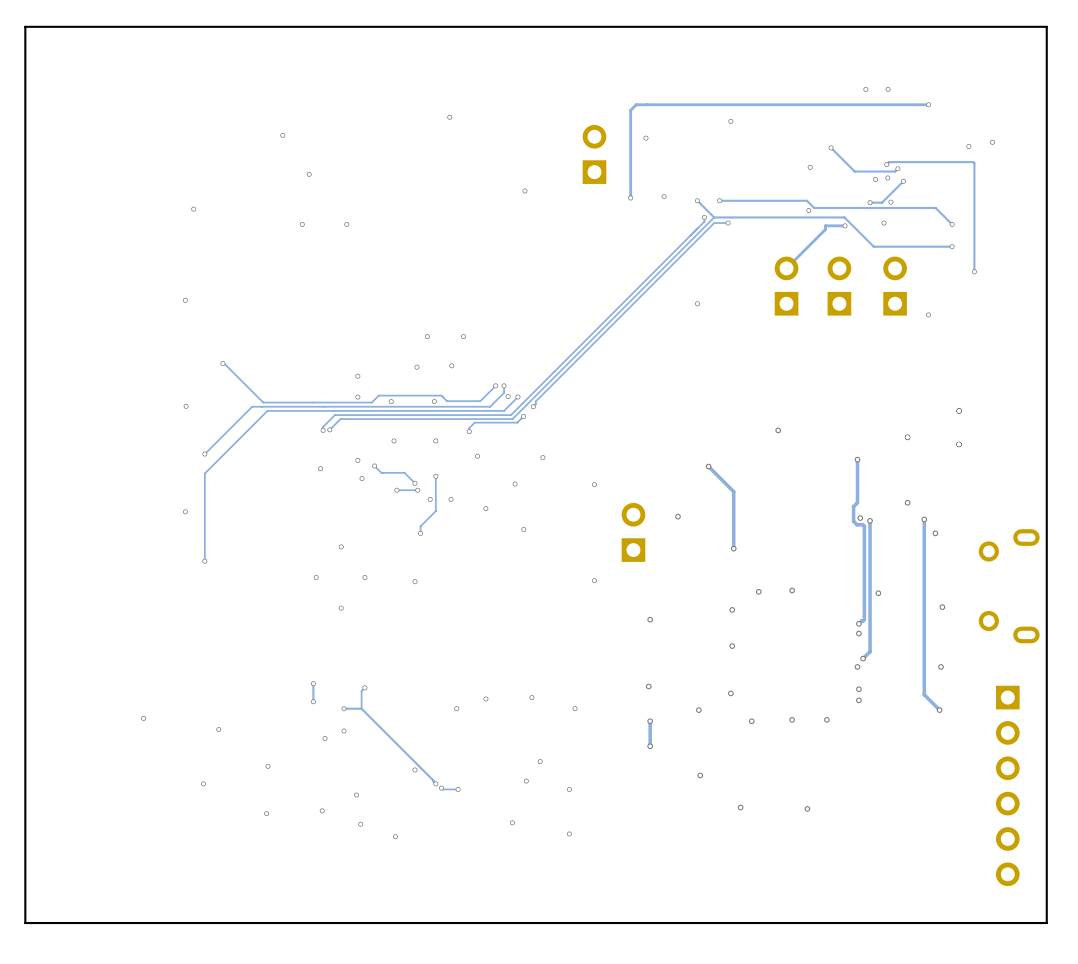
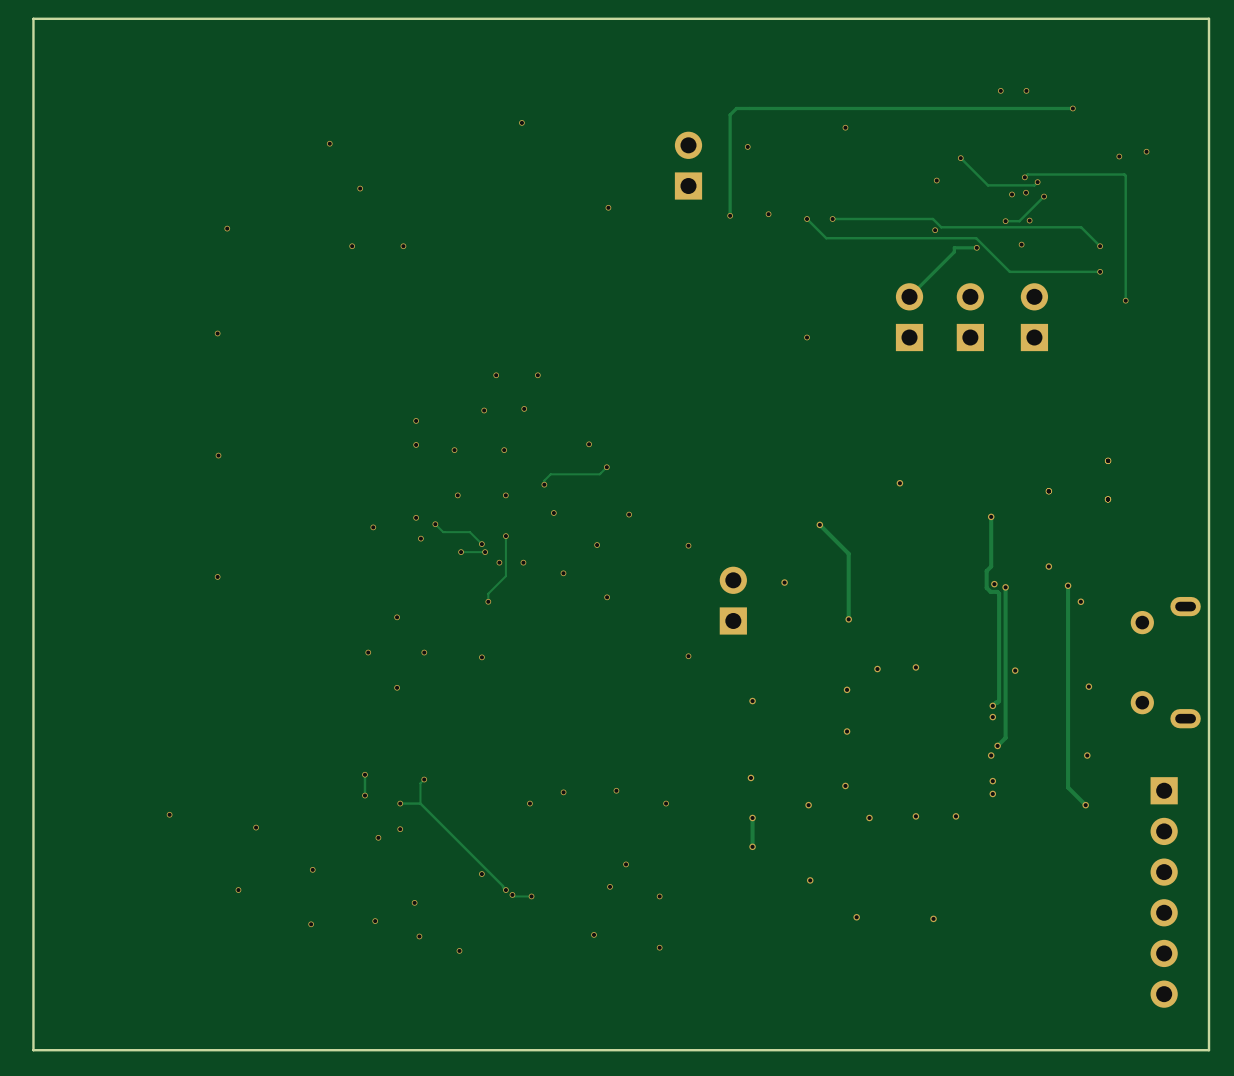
track: (704, 217) (704, 221) (511, 415) (334, 415) (323, 426) (323, 430) -> none
via: (704, 217) -> none
track: (714, 217) (512, 419) (340, 419) (329, 429) -> none
track: (728, 223) (714, 223) (535, 401) (533, 406) -> none
via: (728, 223) -> none
via: (928, 314) -> none
track: (222, 363) (263, 402) (371, 402) (378, 395) (441, 395) (446, 401) (480, 401) (495, 385) -> none
via: (222, 363) -> none
via: (495, 385) -> none
track: (504, 385) (504, 392) (490, 406) (252, 406) (204, 454) -> none
via: (504, 385) -> none
track: (517, 396) (504, 410) (267, 410) (204, 473) (204, 561) -> none
via: (517, 396) -> none
via: (533, 406) -> none
via: (329, 429) -> none
via: (323, 430) -> none
via: (204, 454) -> none
via: (204, 561) -> none

